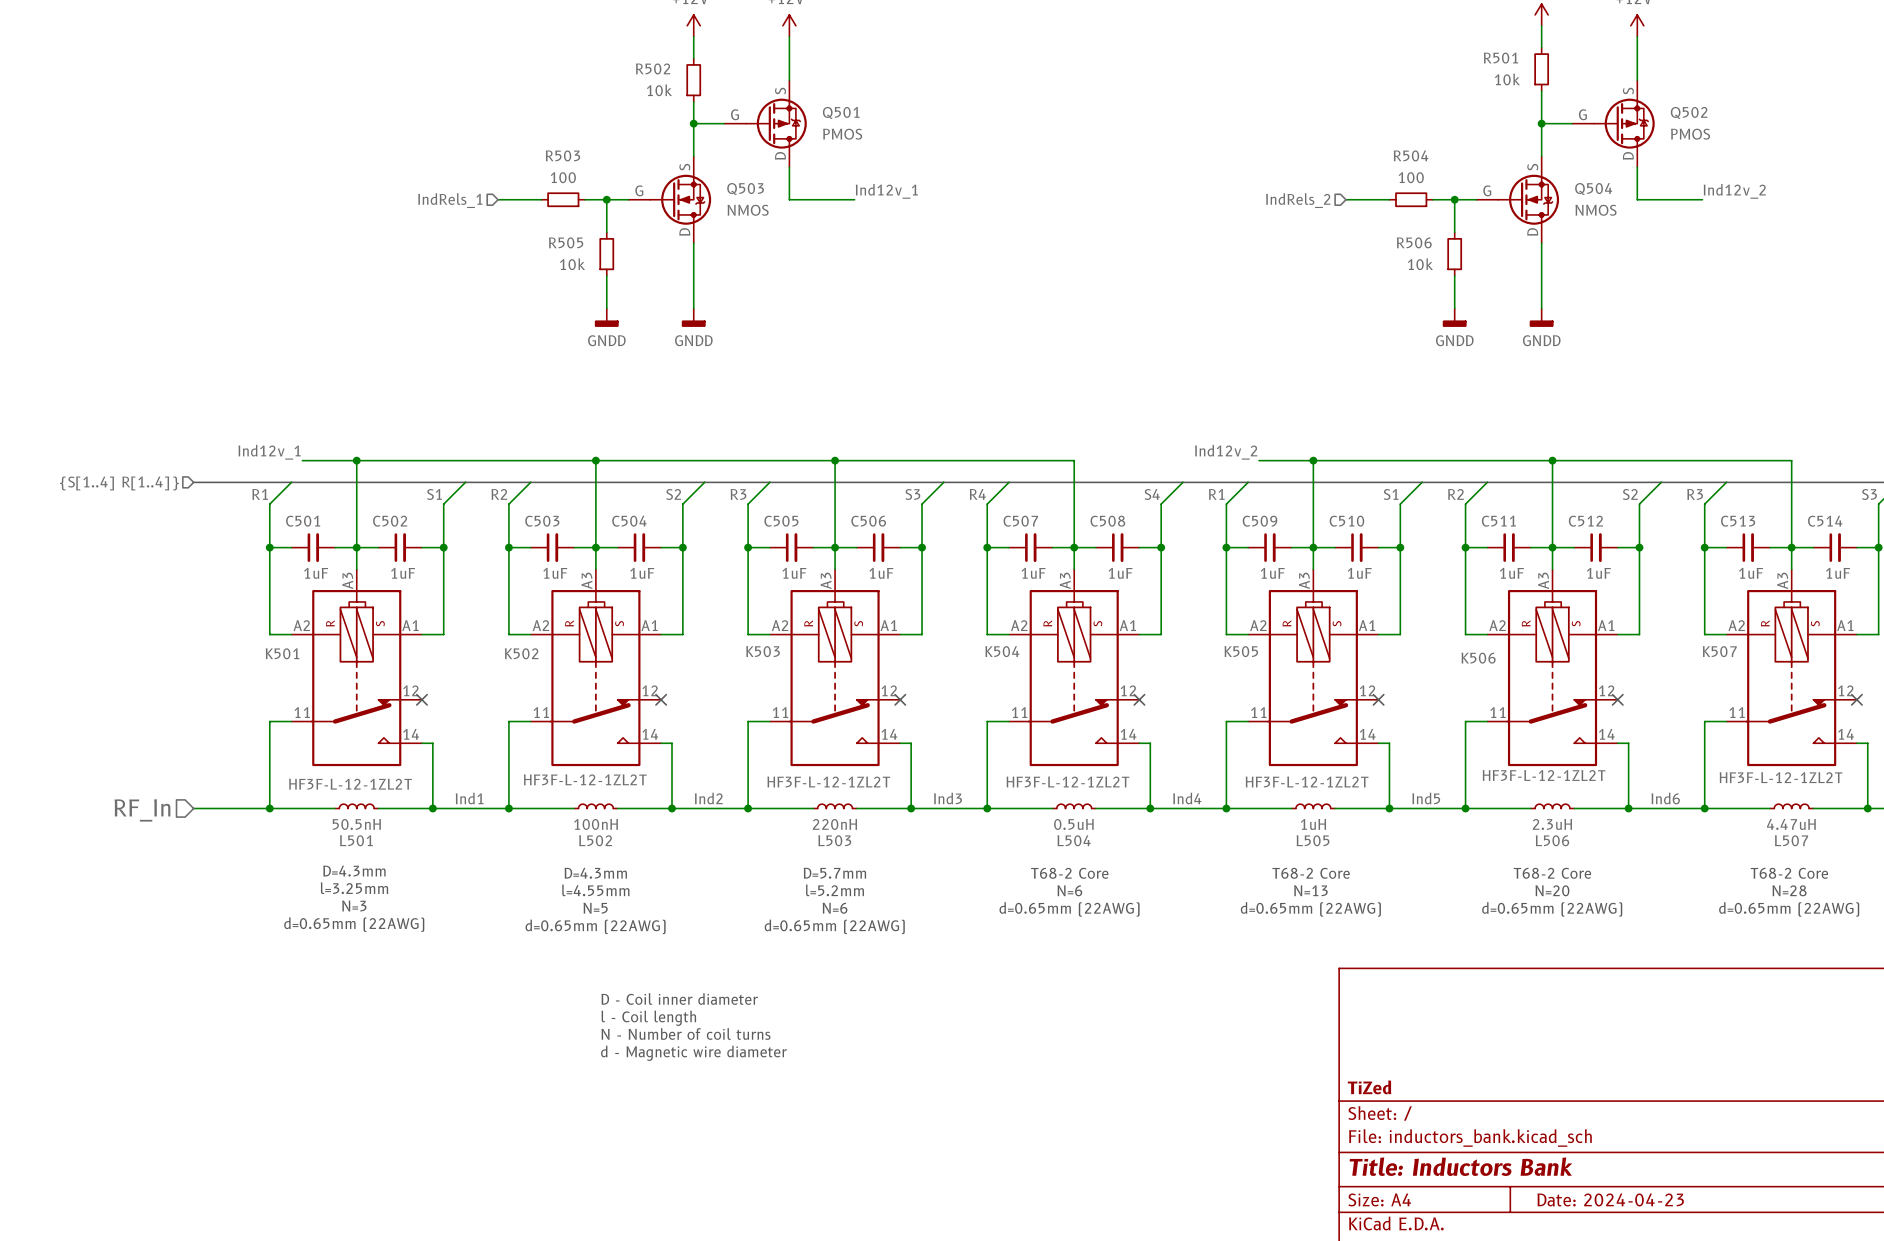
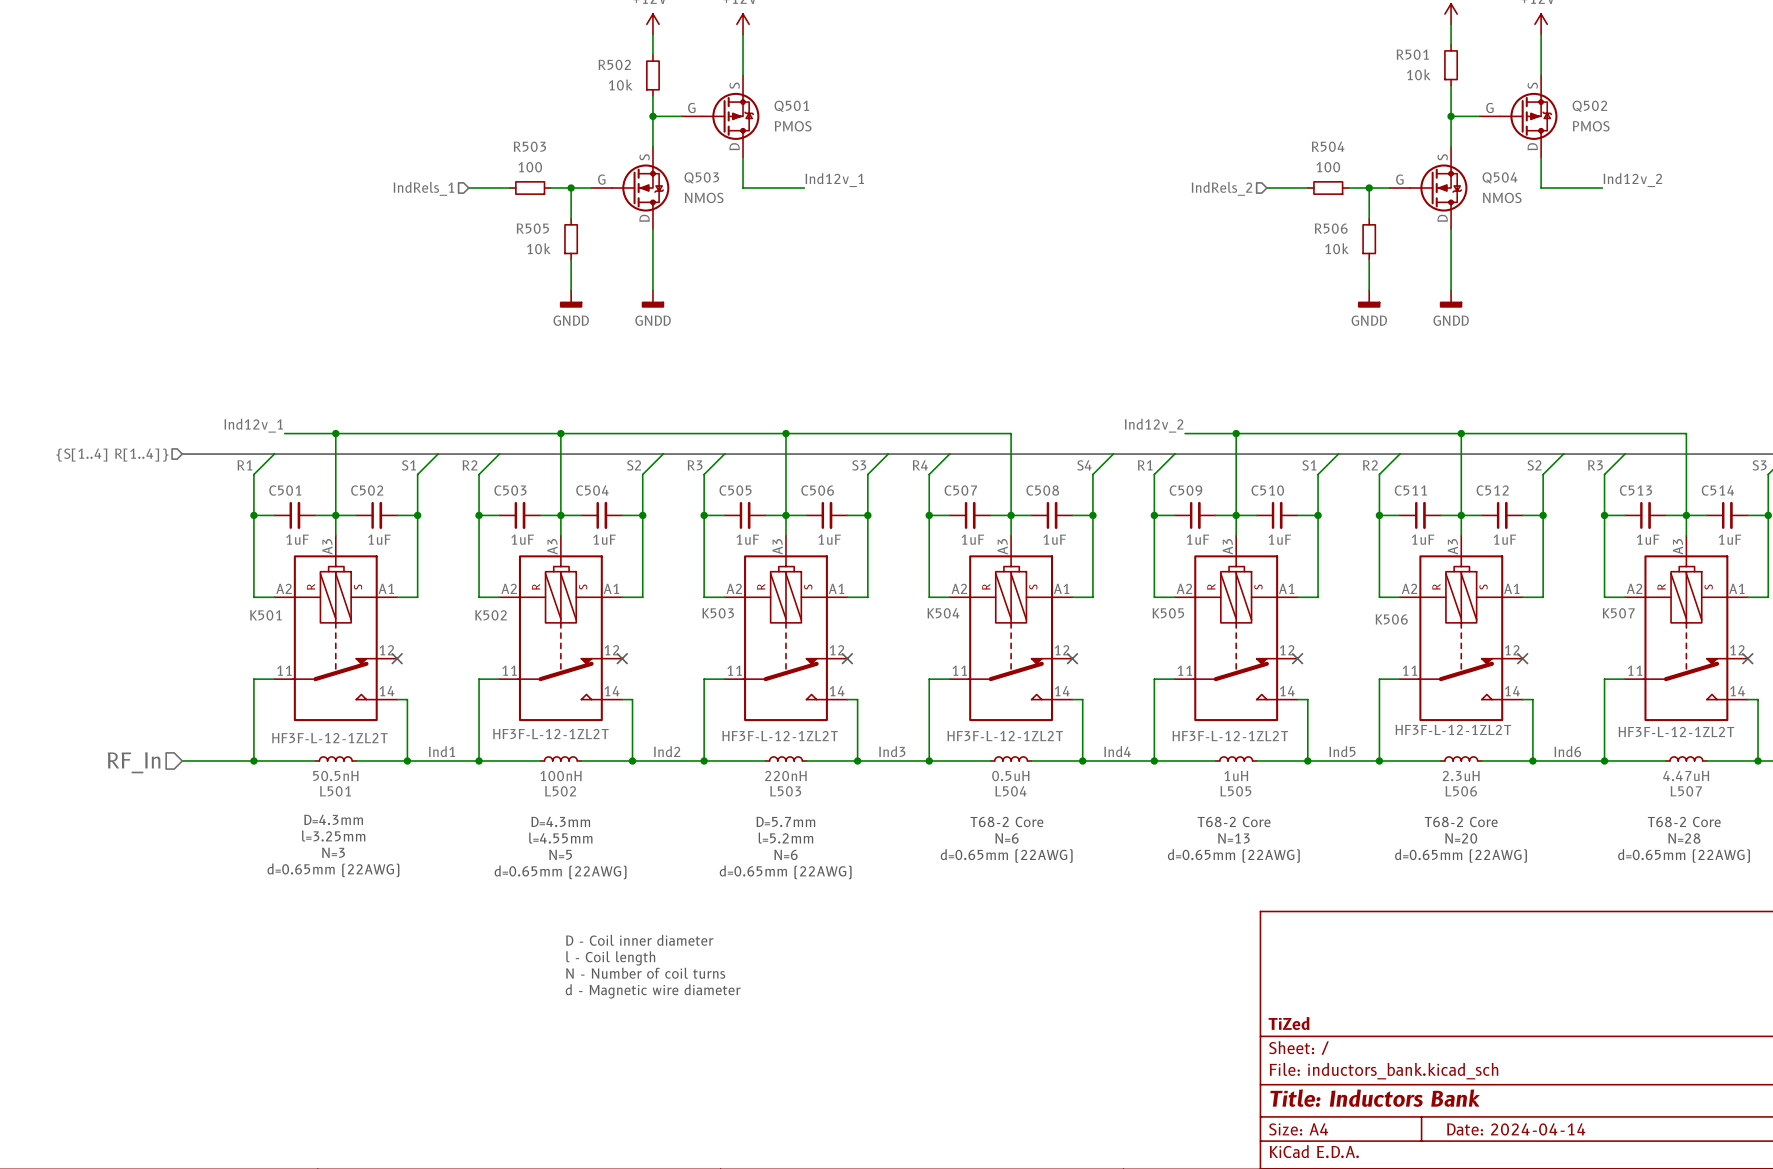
title block: Date: 2024-04-23 (1610, 1199) -> Date: 2024-04-14 (1516, 1129)

